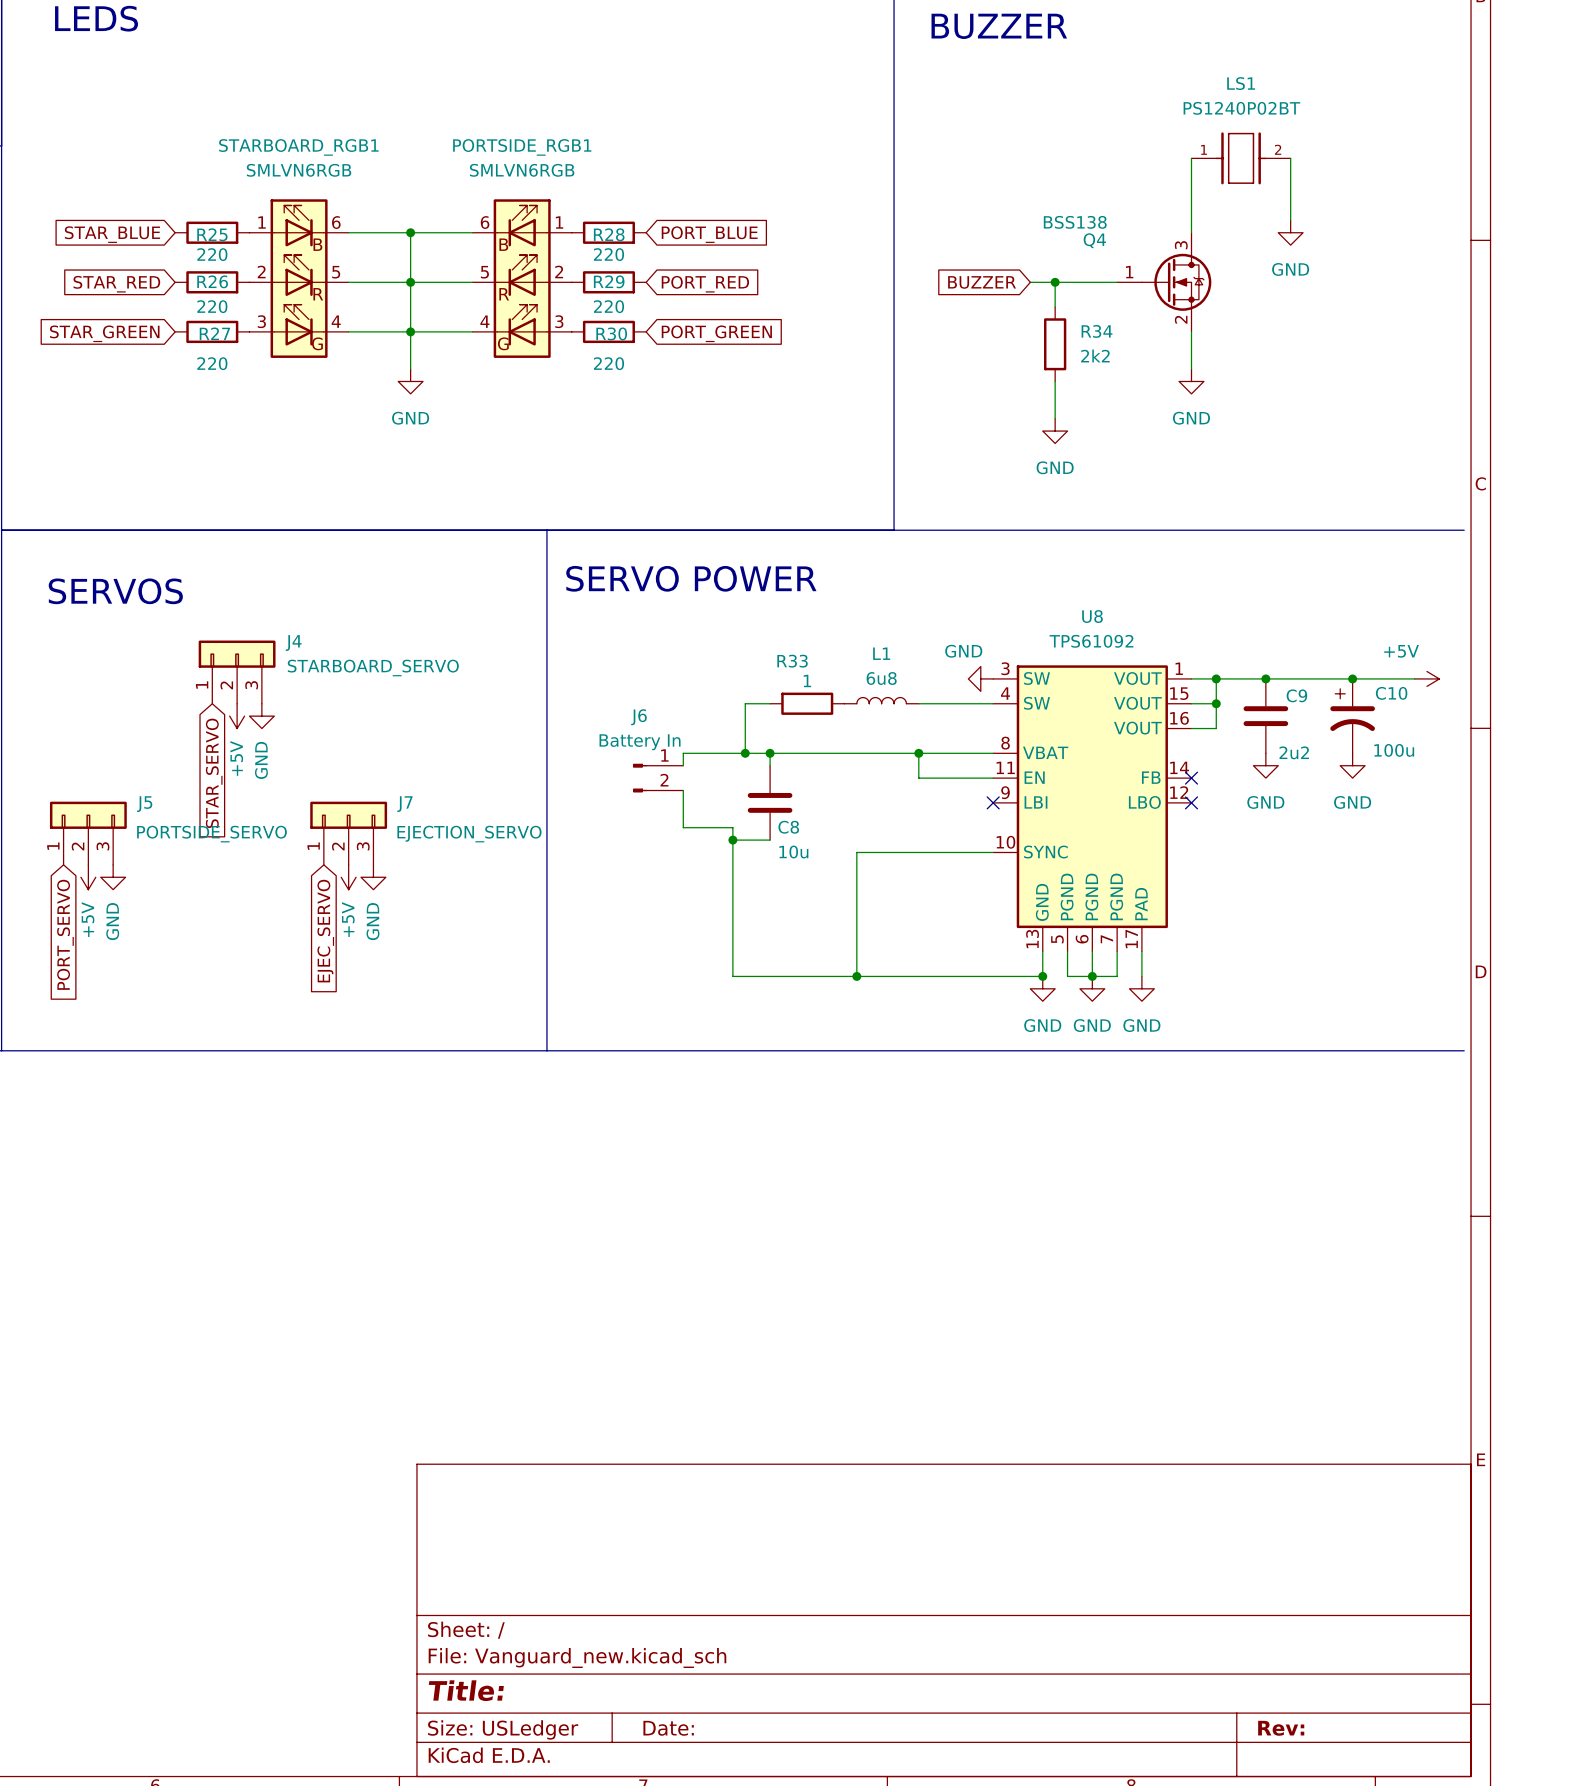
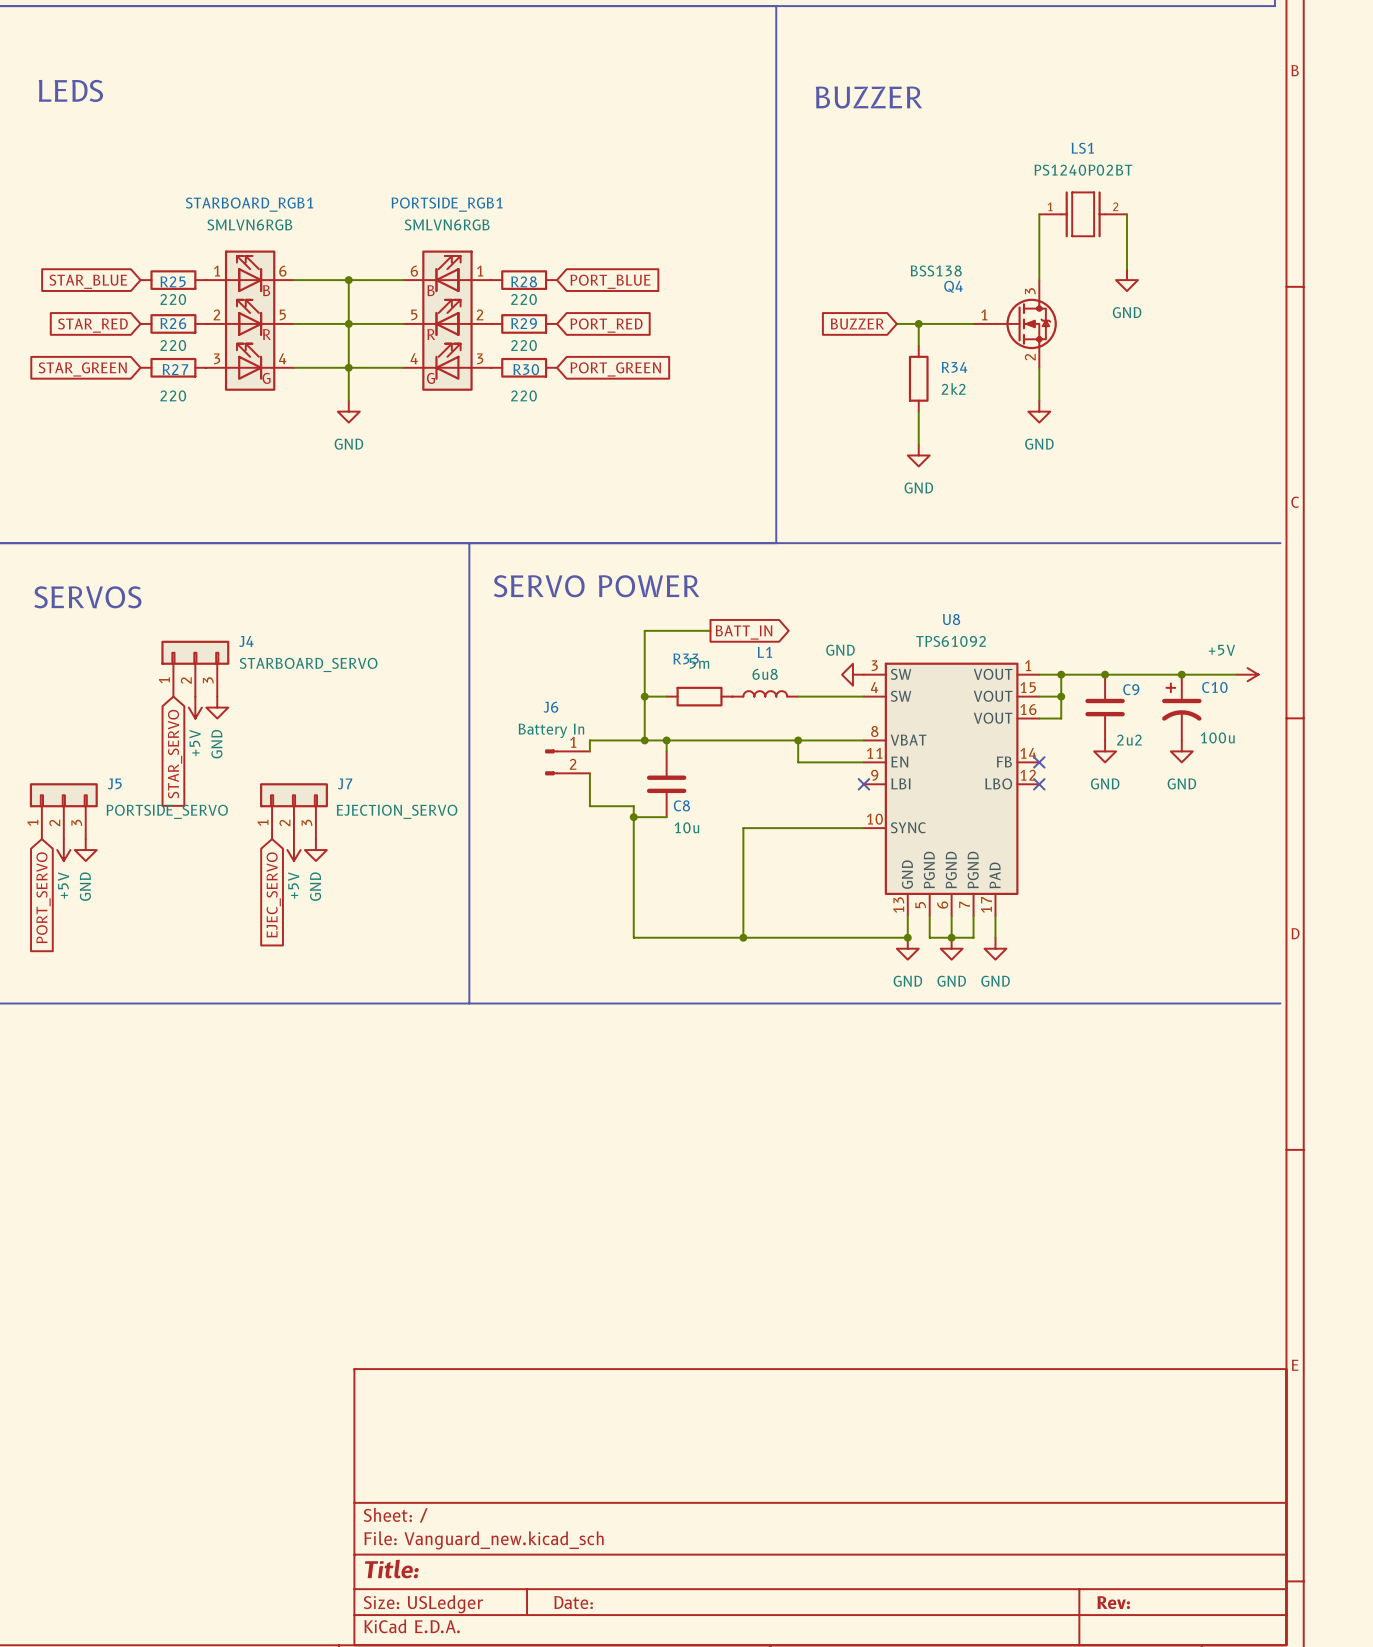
wire: none -> (710, 630) (644, 630) (644, 696)
global label: none -> BATT_IN (744, 632)
R33 value: 1 (807, 680) -> 5m (699, 663)
junction: none -> (644, 696)

